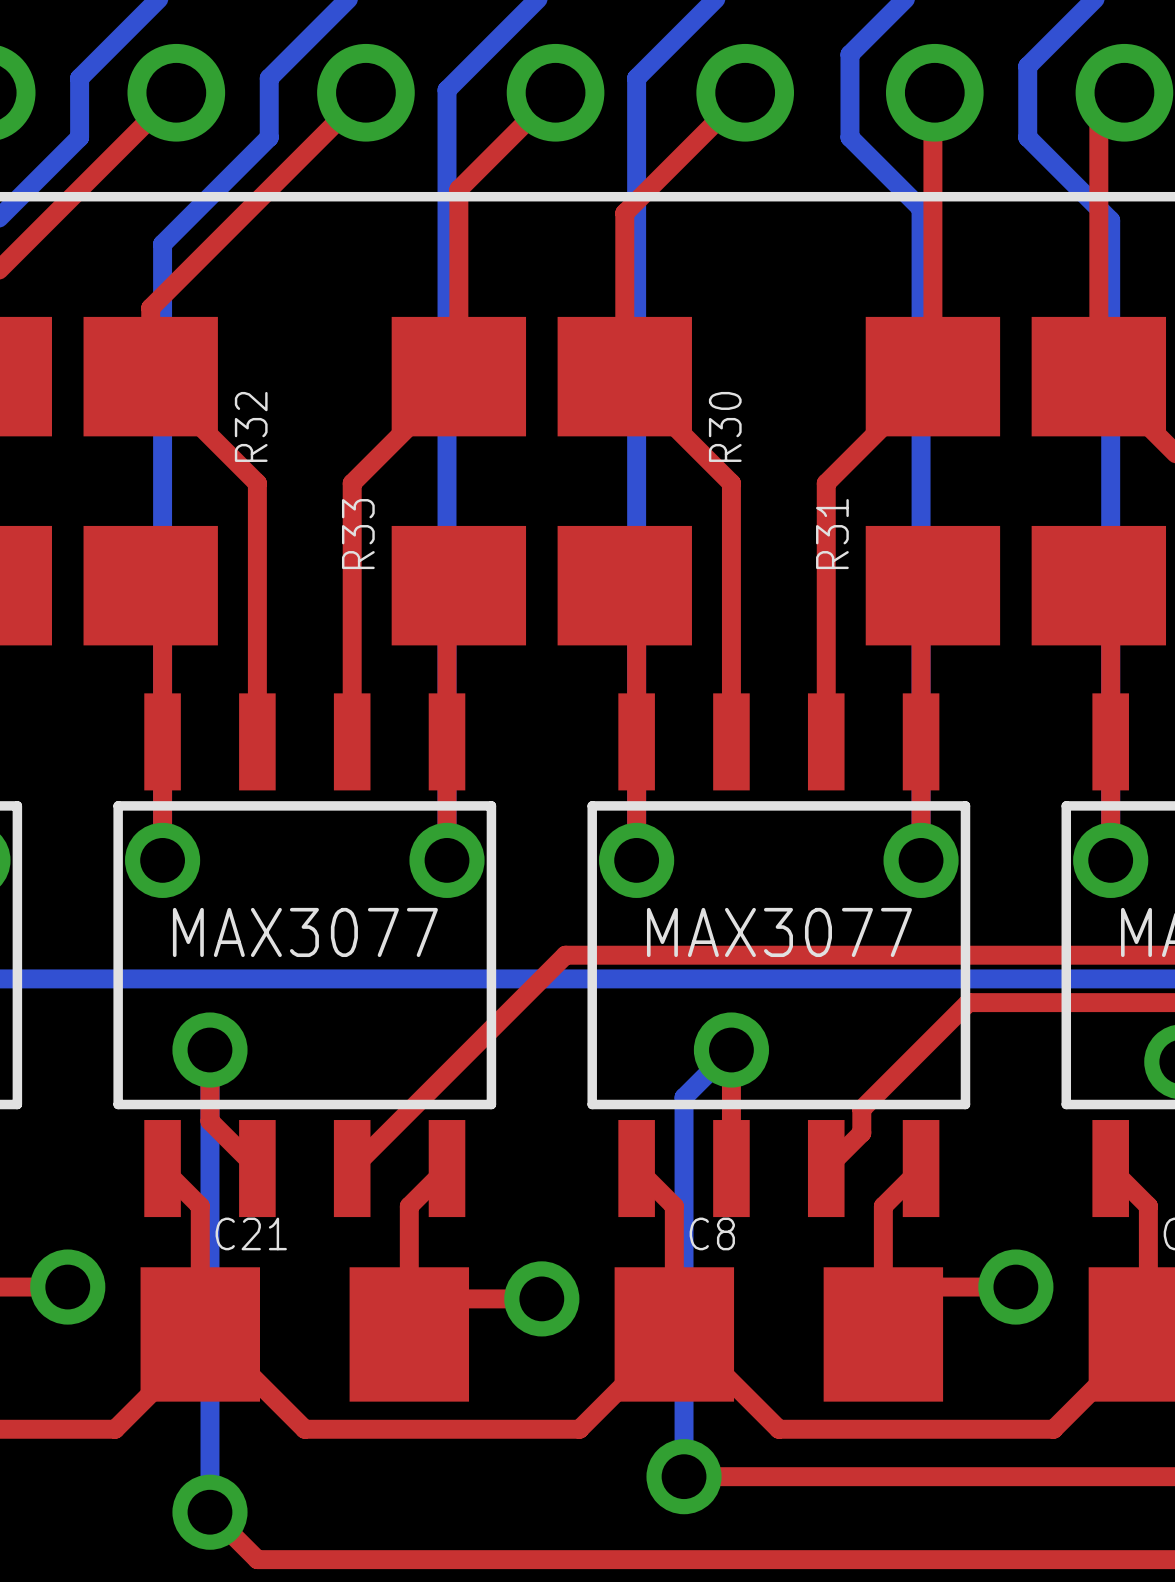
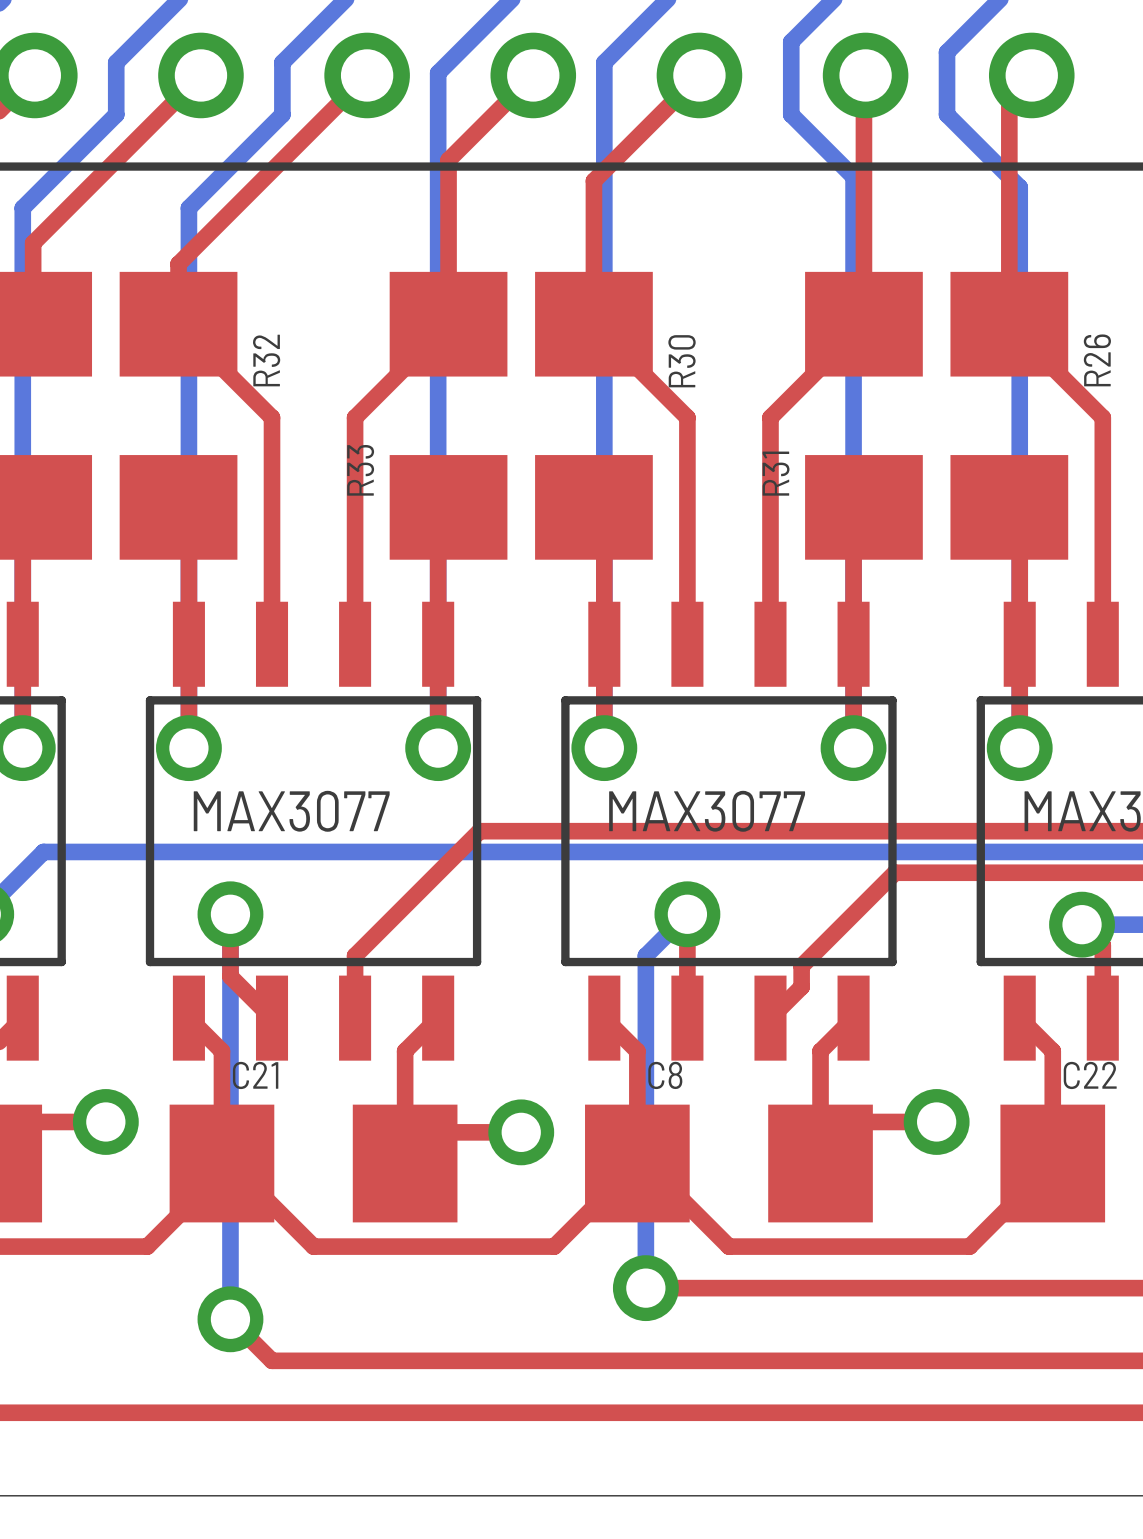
top track: (565, 955) (352, 1168) -> (542, 831) (479, 831) (355, 955) (355, 1018)

